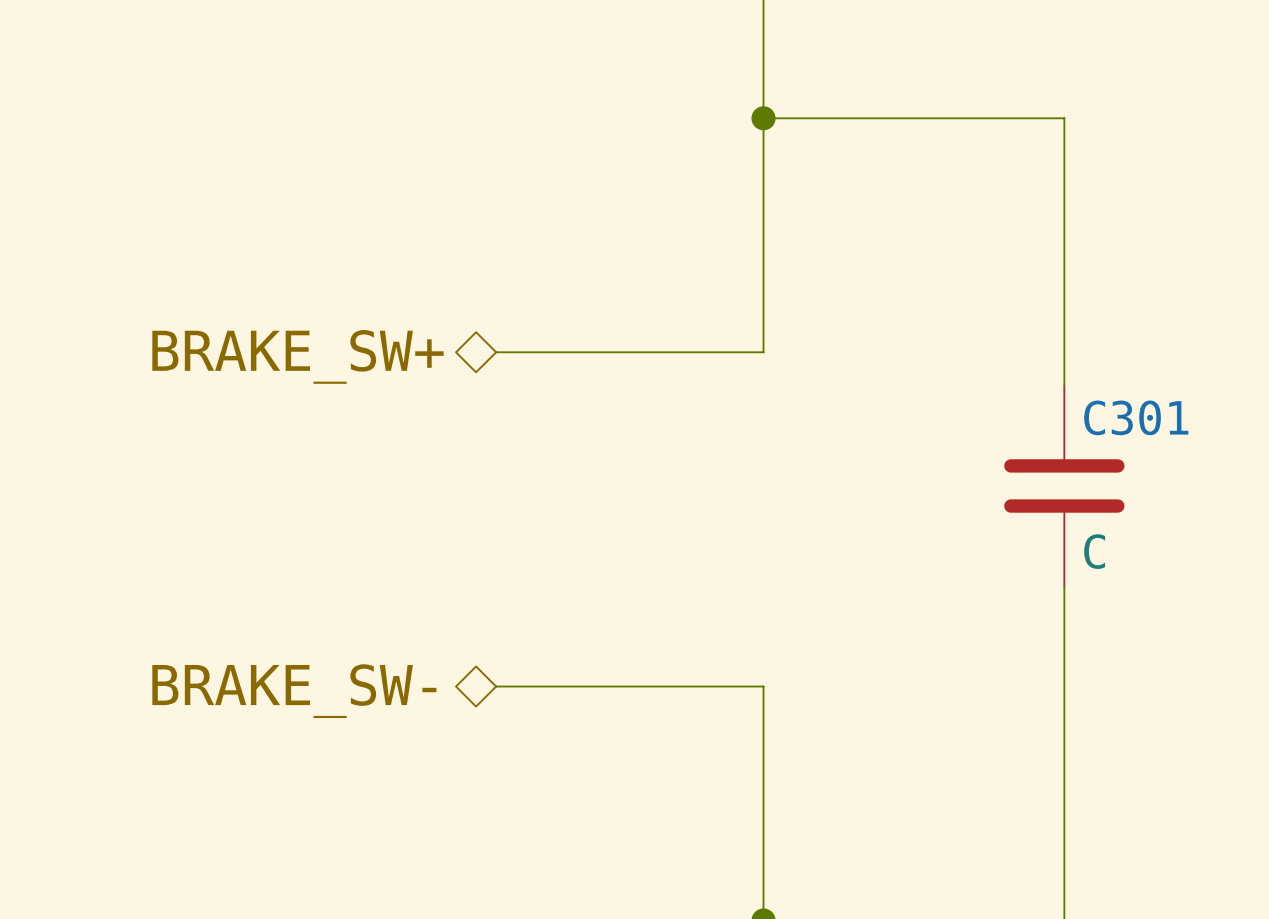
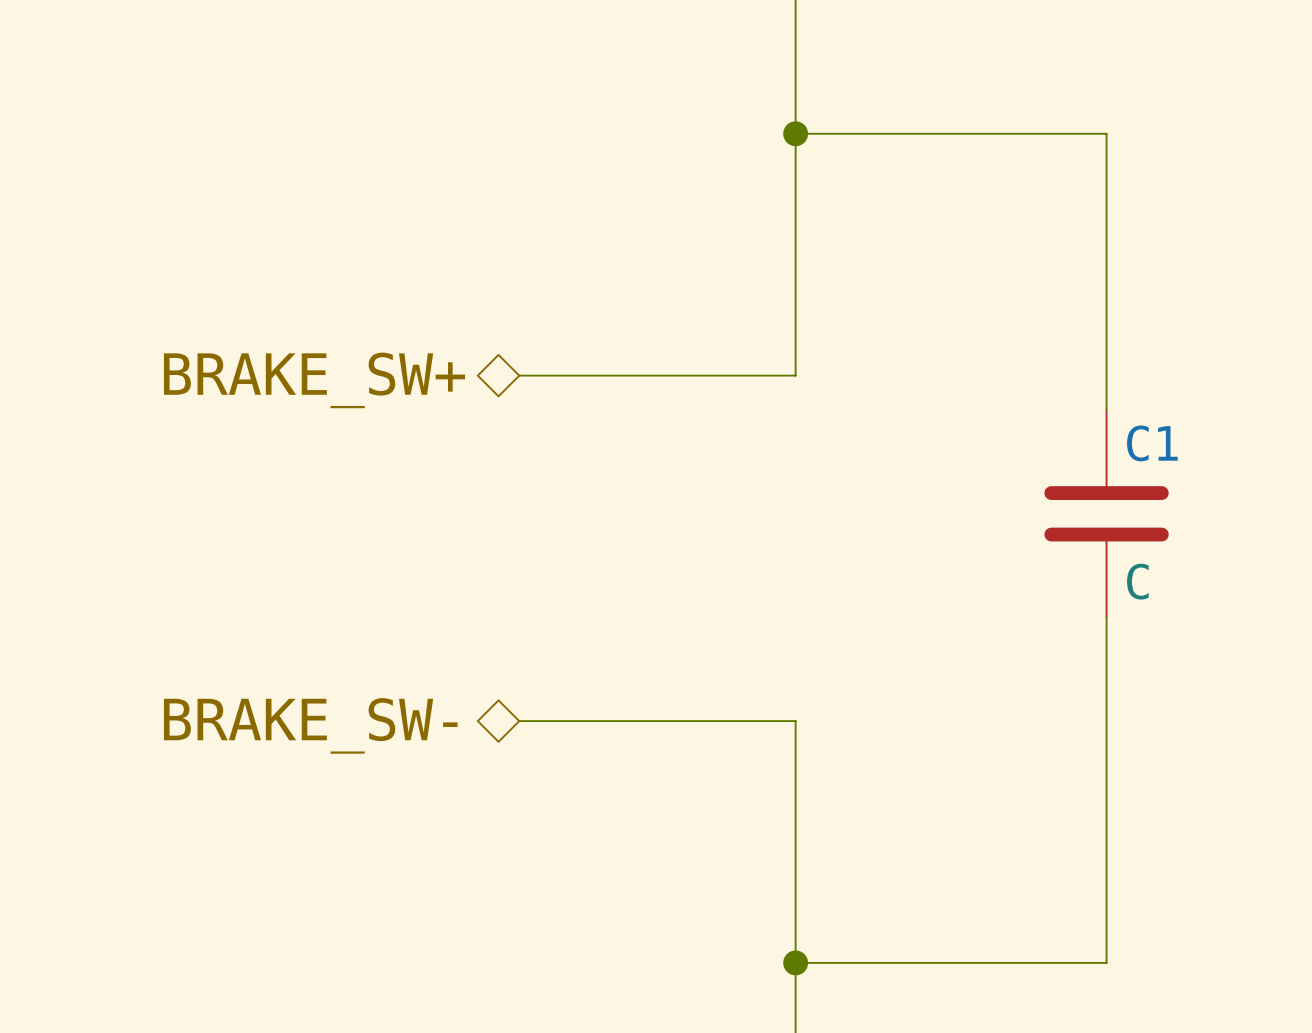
C301 name: C301 (1136, 417) -> C1 (1152, 443)

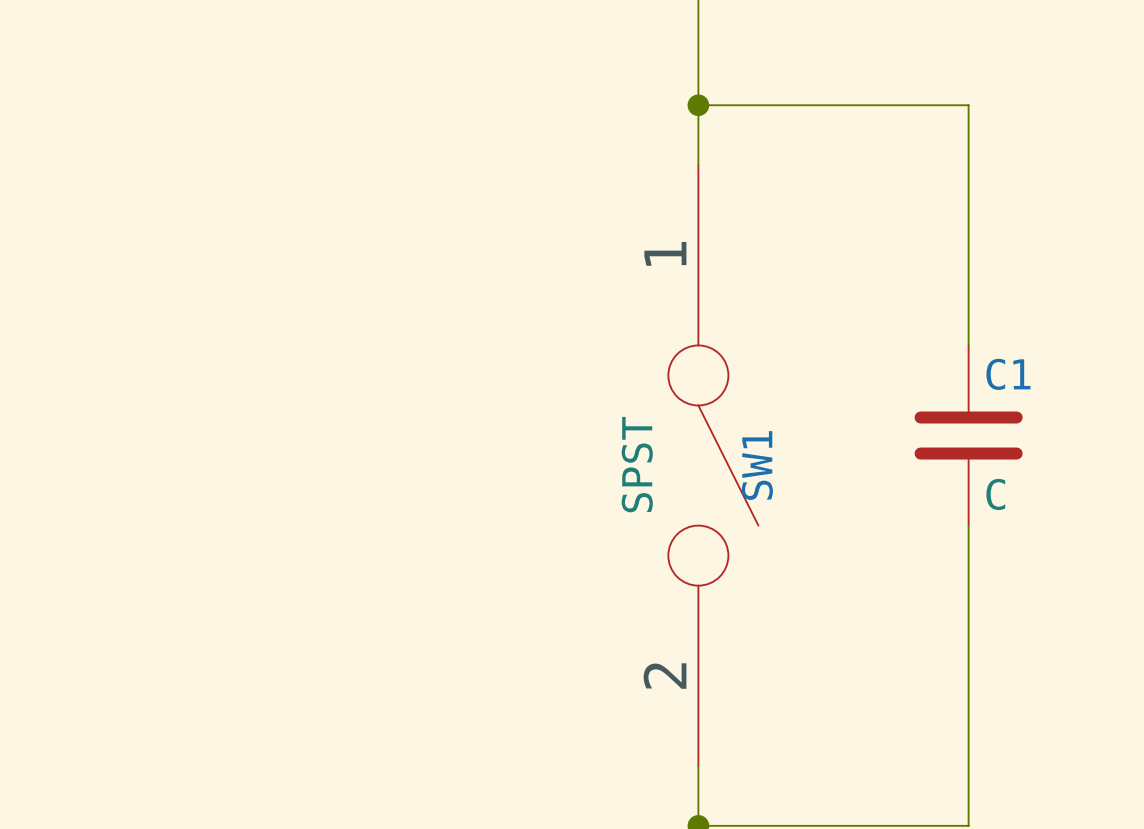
wire: (795, 202) (795, 375) (519, 375) -> none
hierarchical label: BRAKE_SW+ (314, 380) -> none
SW1: none -> SPST (713, 465)
wire: (519, 721) (795, 721) (795, 893) -> none
hierarchical label: BRAKE_SW- (310, 725) -> none

